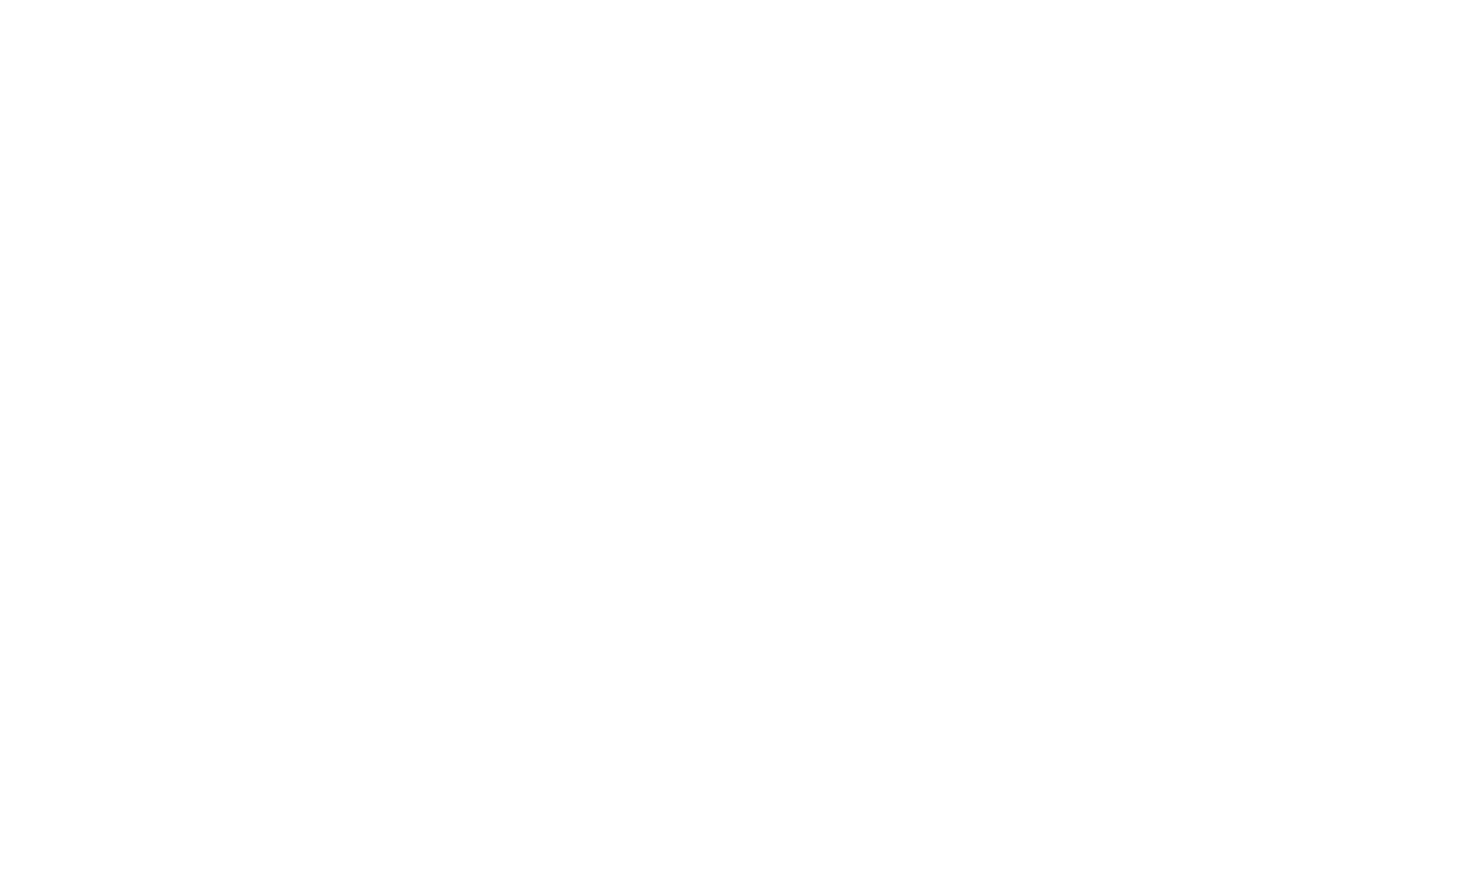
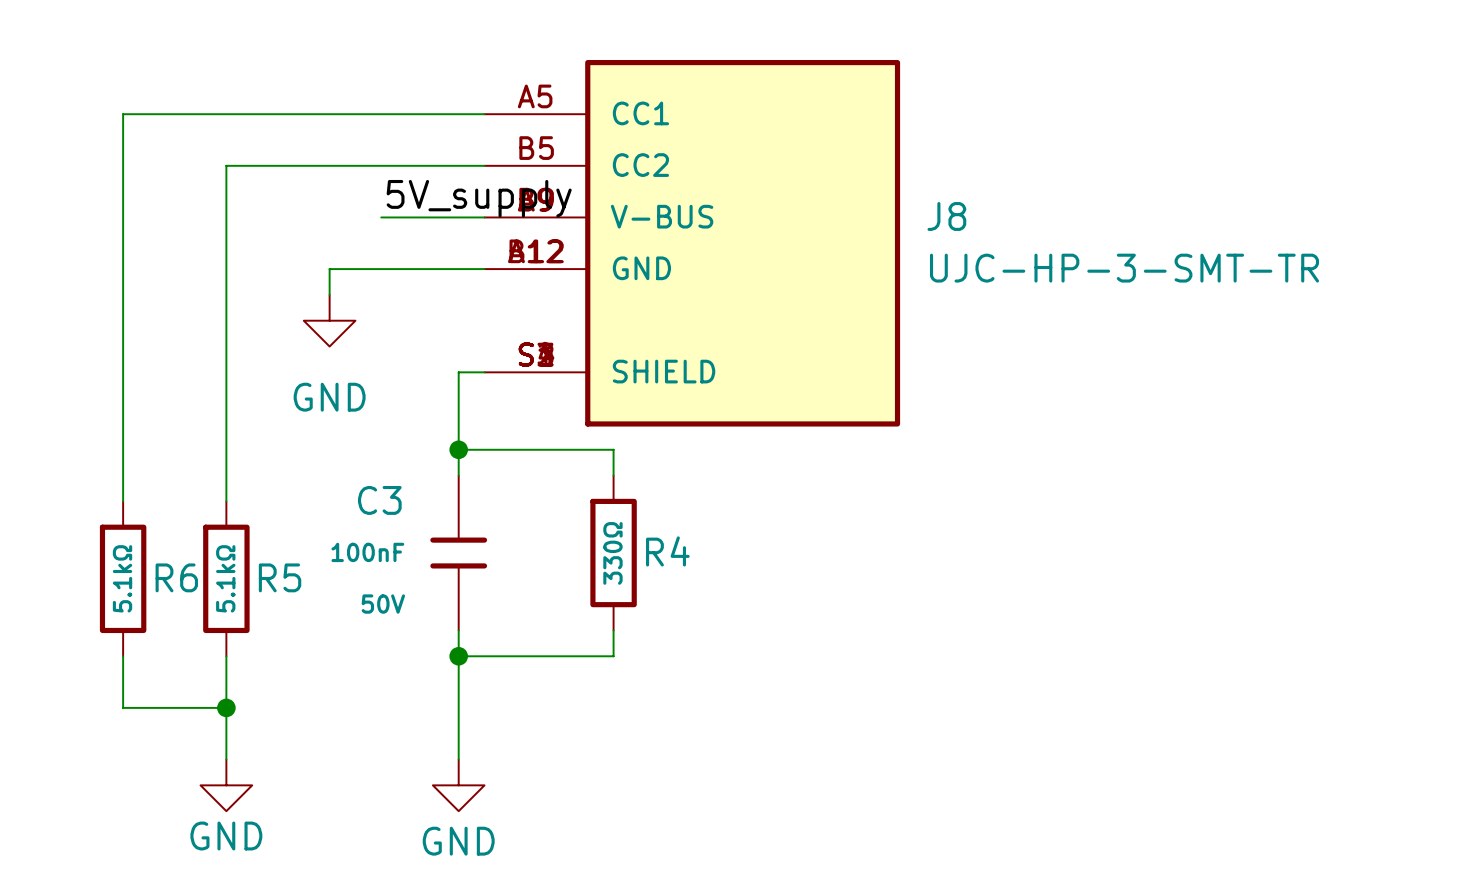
wire: none -> (484, 114) (123, 114) (123, 501)
wire: none -> (484, 165) (226, 165) (226, 501)
label: none -> 5V_supply (479, 198)
wire: none -> (381, 217) (484, 217)
J8: none -> UJC-HP-3-SMT-TR (692, 243)
wire: none -> (484, 269) (329, 269) (329, 294)
power symbol: none -> GND (329, 320)
wire: none -> (484, 372) (458, 372) (458, 475)
wire: none -> (458, 449) (613, 449) (613, 475)
junction: none -> (458, 449)
C3: none -> 100nF (458, 553)
R4: none -> 330Ω (613, 553)
R6: none -> 5.1kΩ (123, 578)
R5: none -> 5.1kΩ (226, 578)
wire: none -> (458, 630) (458, 759)
wire: none -> (613, 630) (613, 656) (458, 656)
wire: none -> (123, 656) (123, 707) (226, 707)
wire: none -> (226, 656) (226, 759)
junction: none -> (458, 656)
junction: none -> (226, 707)
power symbol: none -> GND (226, 785)
power symbol: none -> GND (458, 785)

